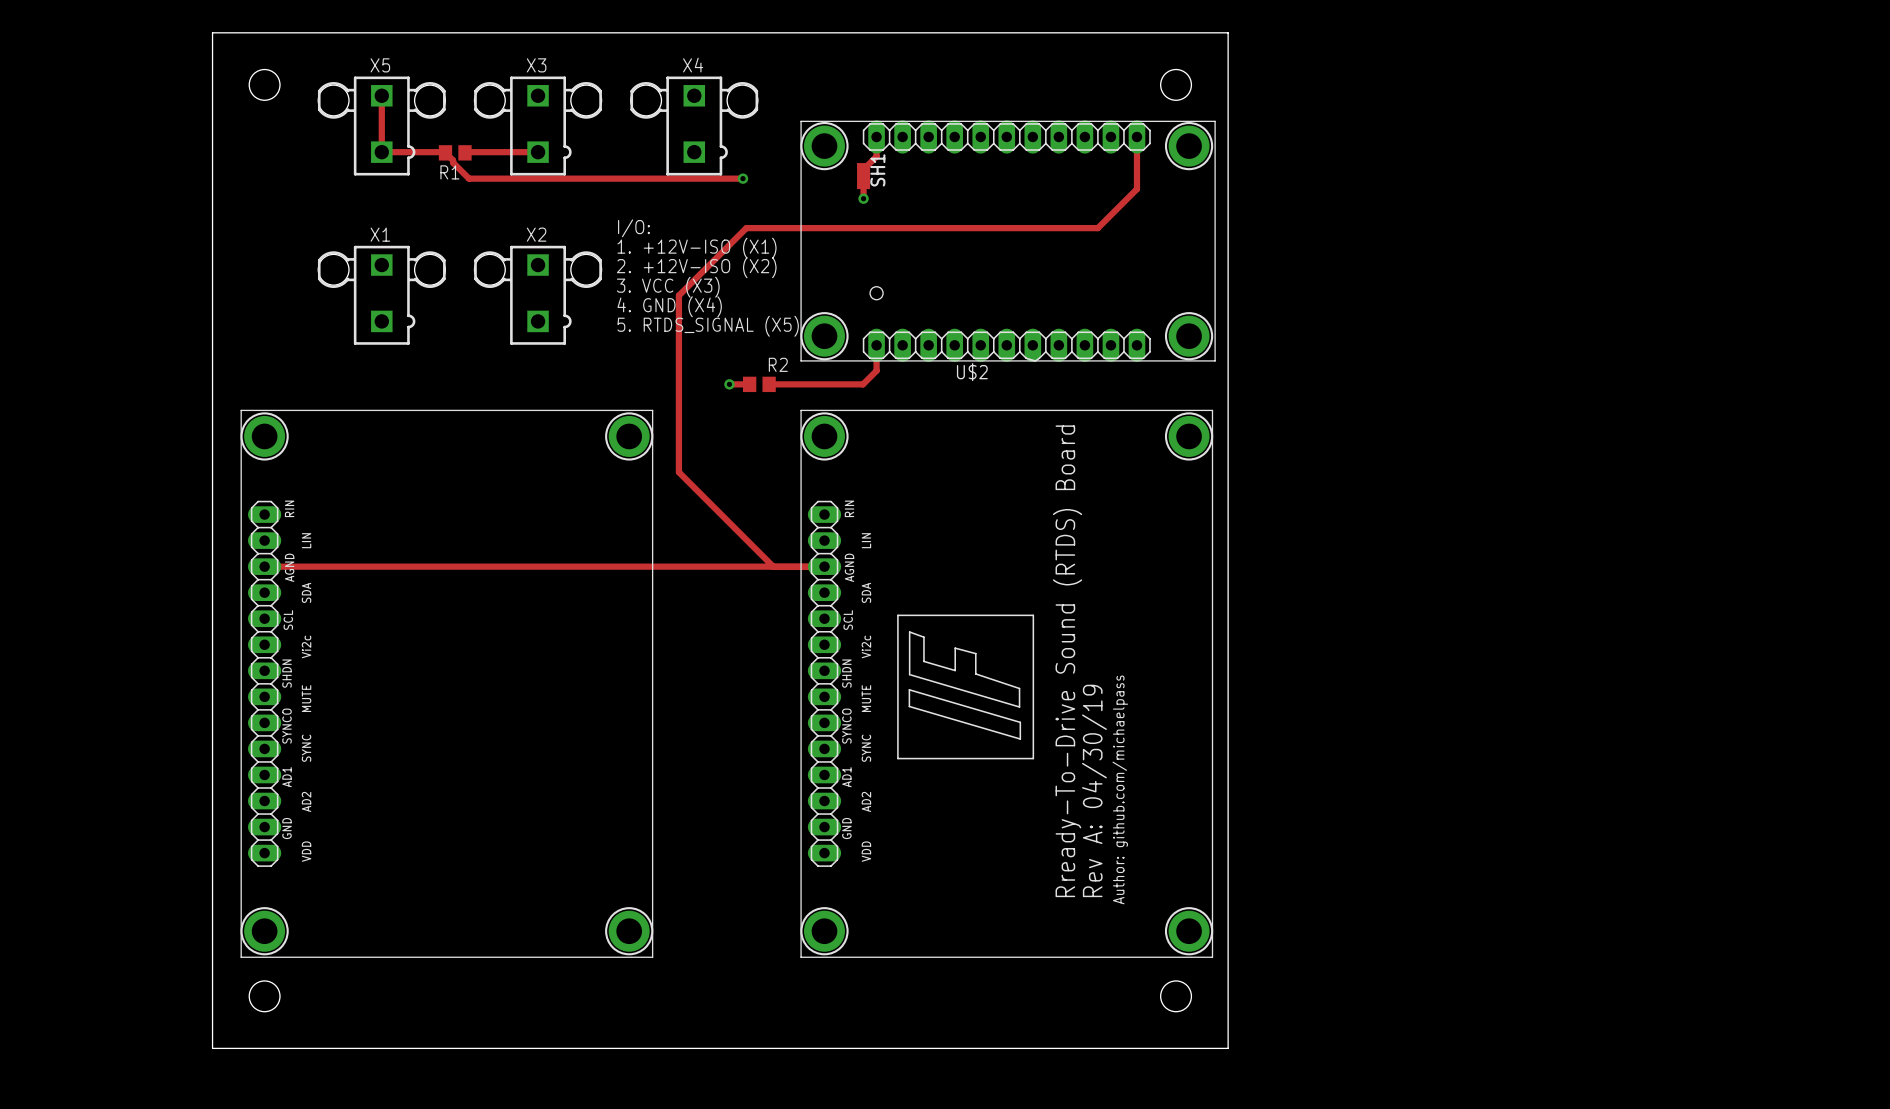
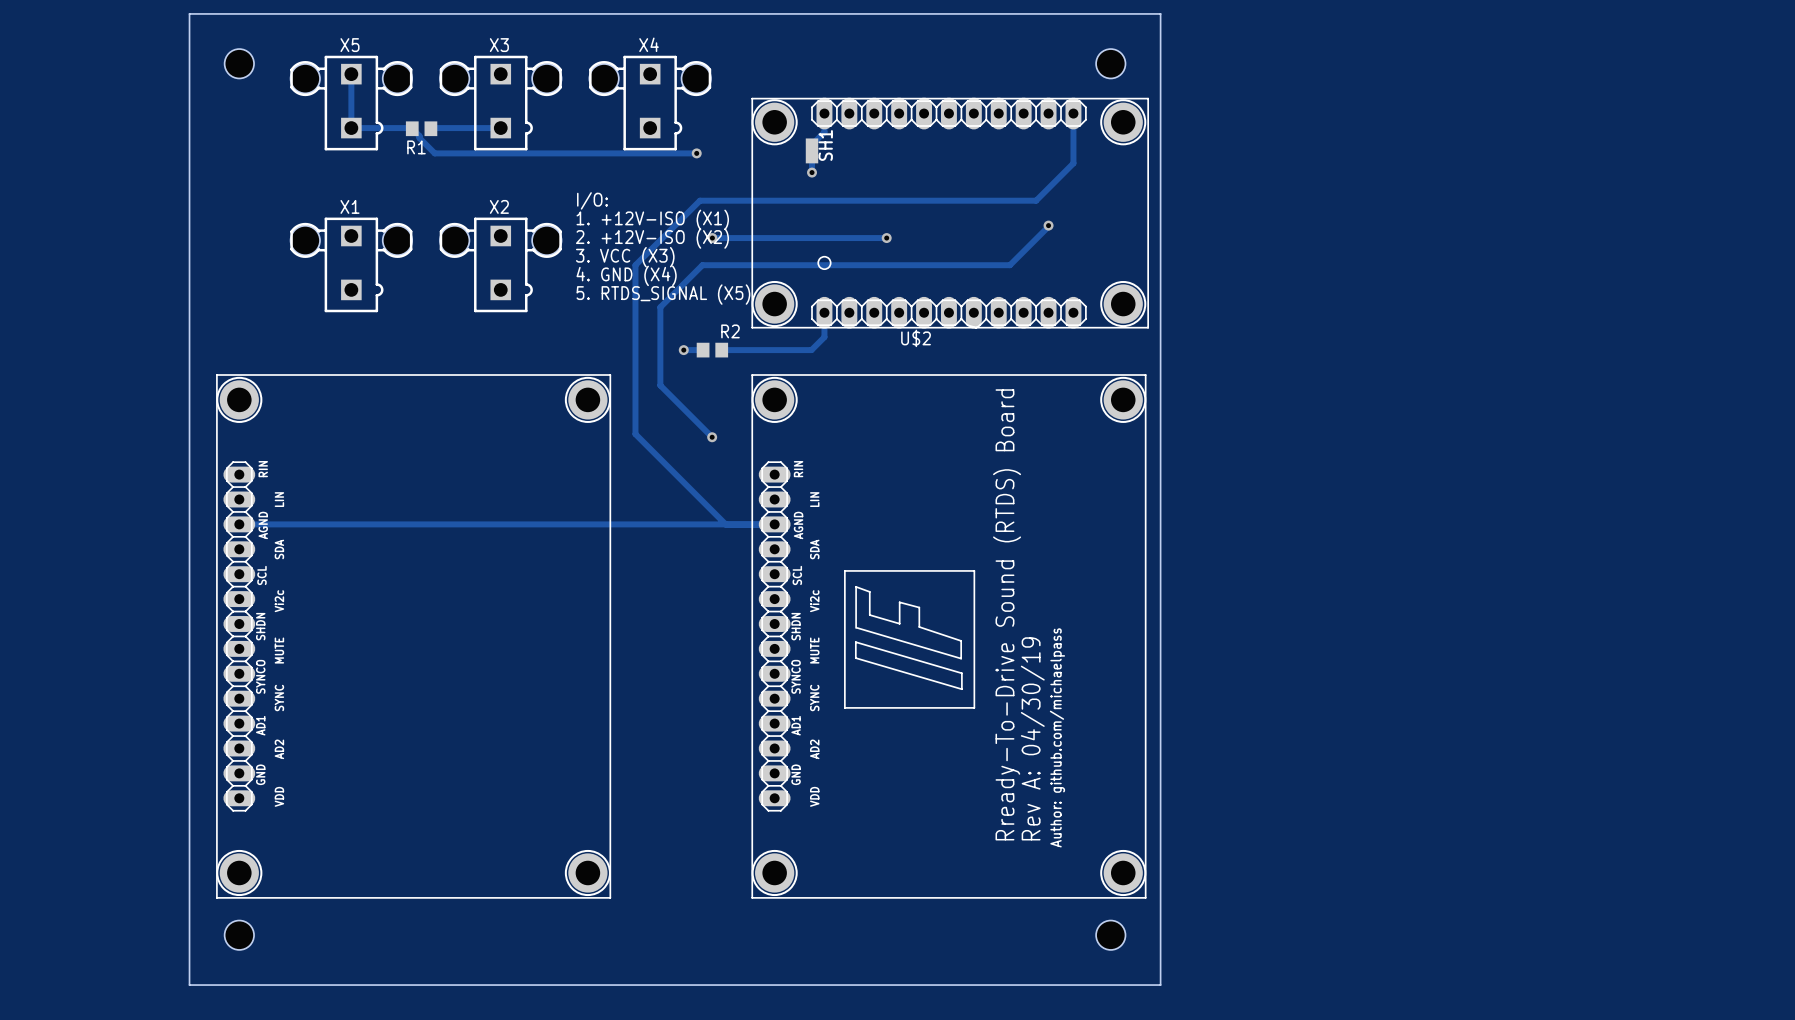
track: none -> (1048, 225) (1009, 265) (702, 265) (660, 307) (660, 385) (712, 437)
via: none -> (1048, 225)
track: none -> (712, 238) (886, 238)
via: none -> (712, 238)
via: none -> (886, 238)
via: none -> (712, 437)

